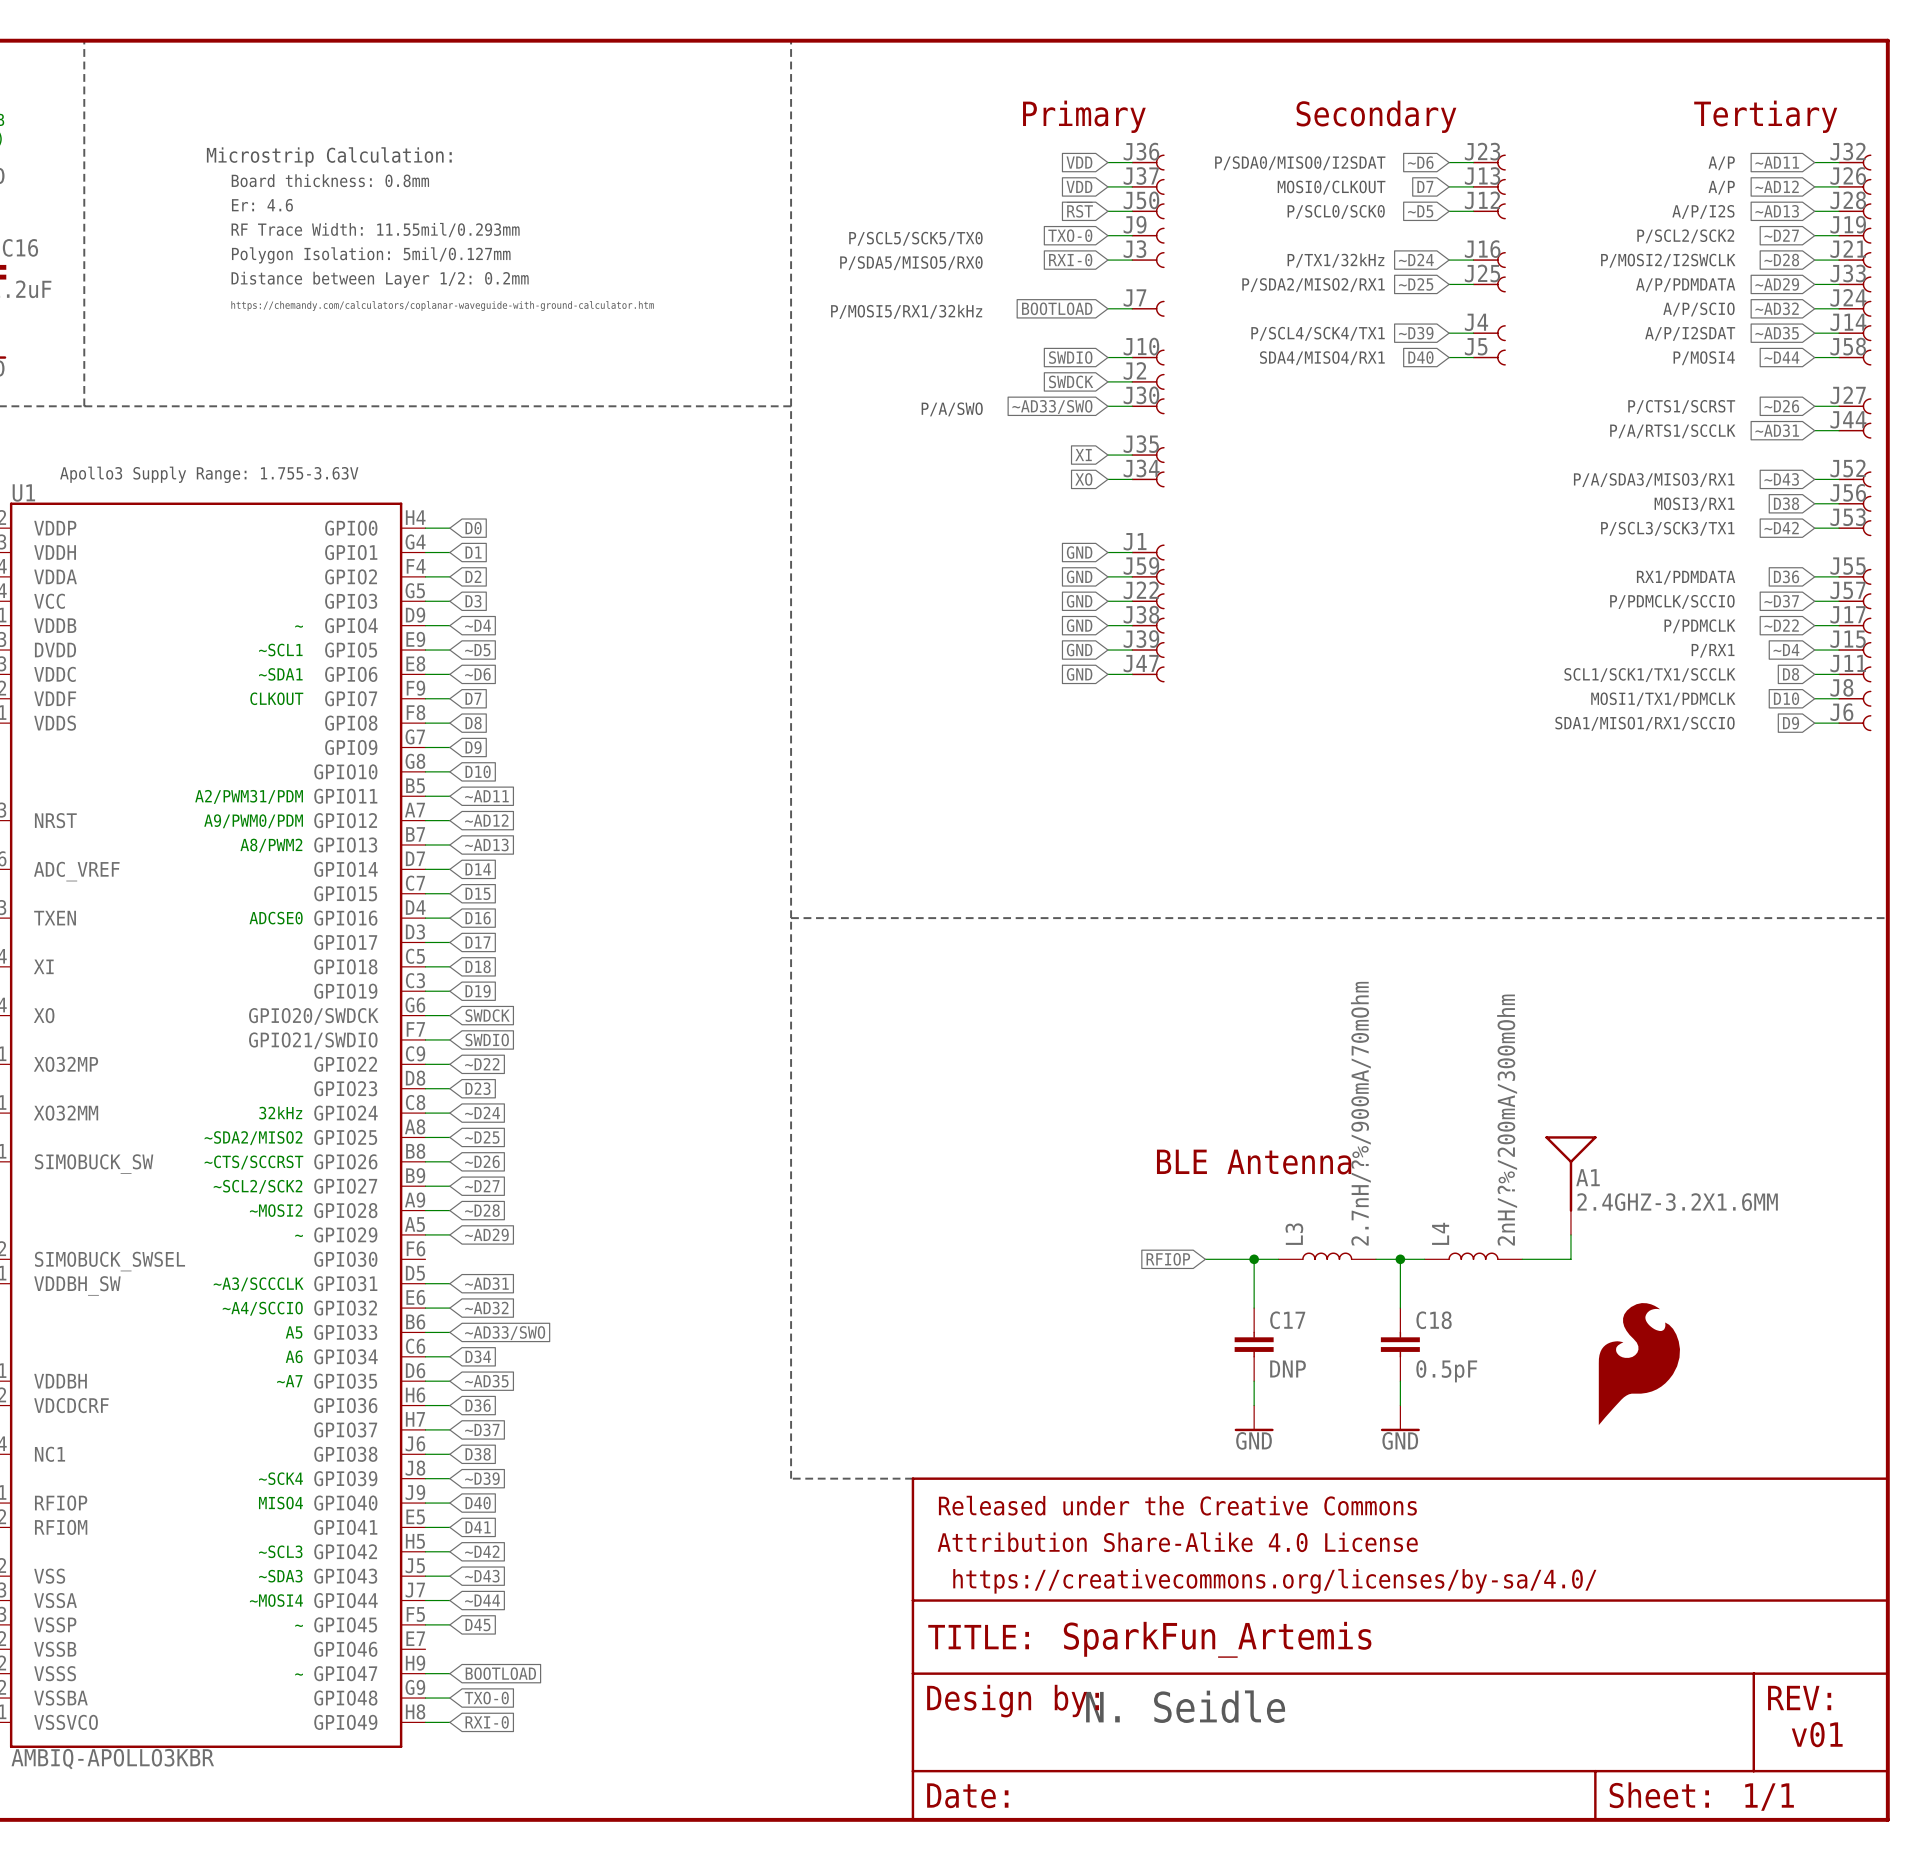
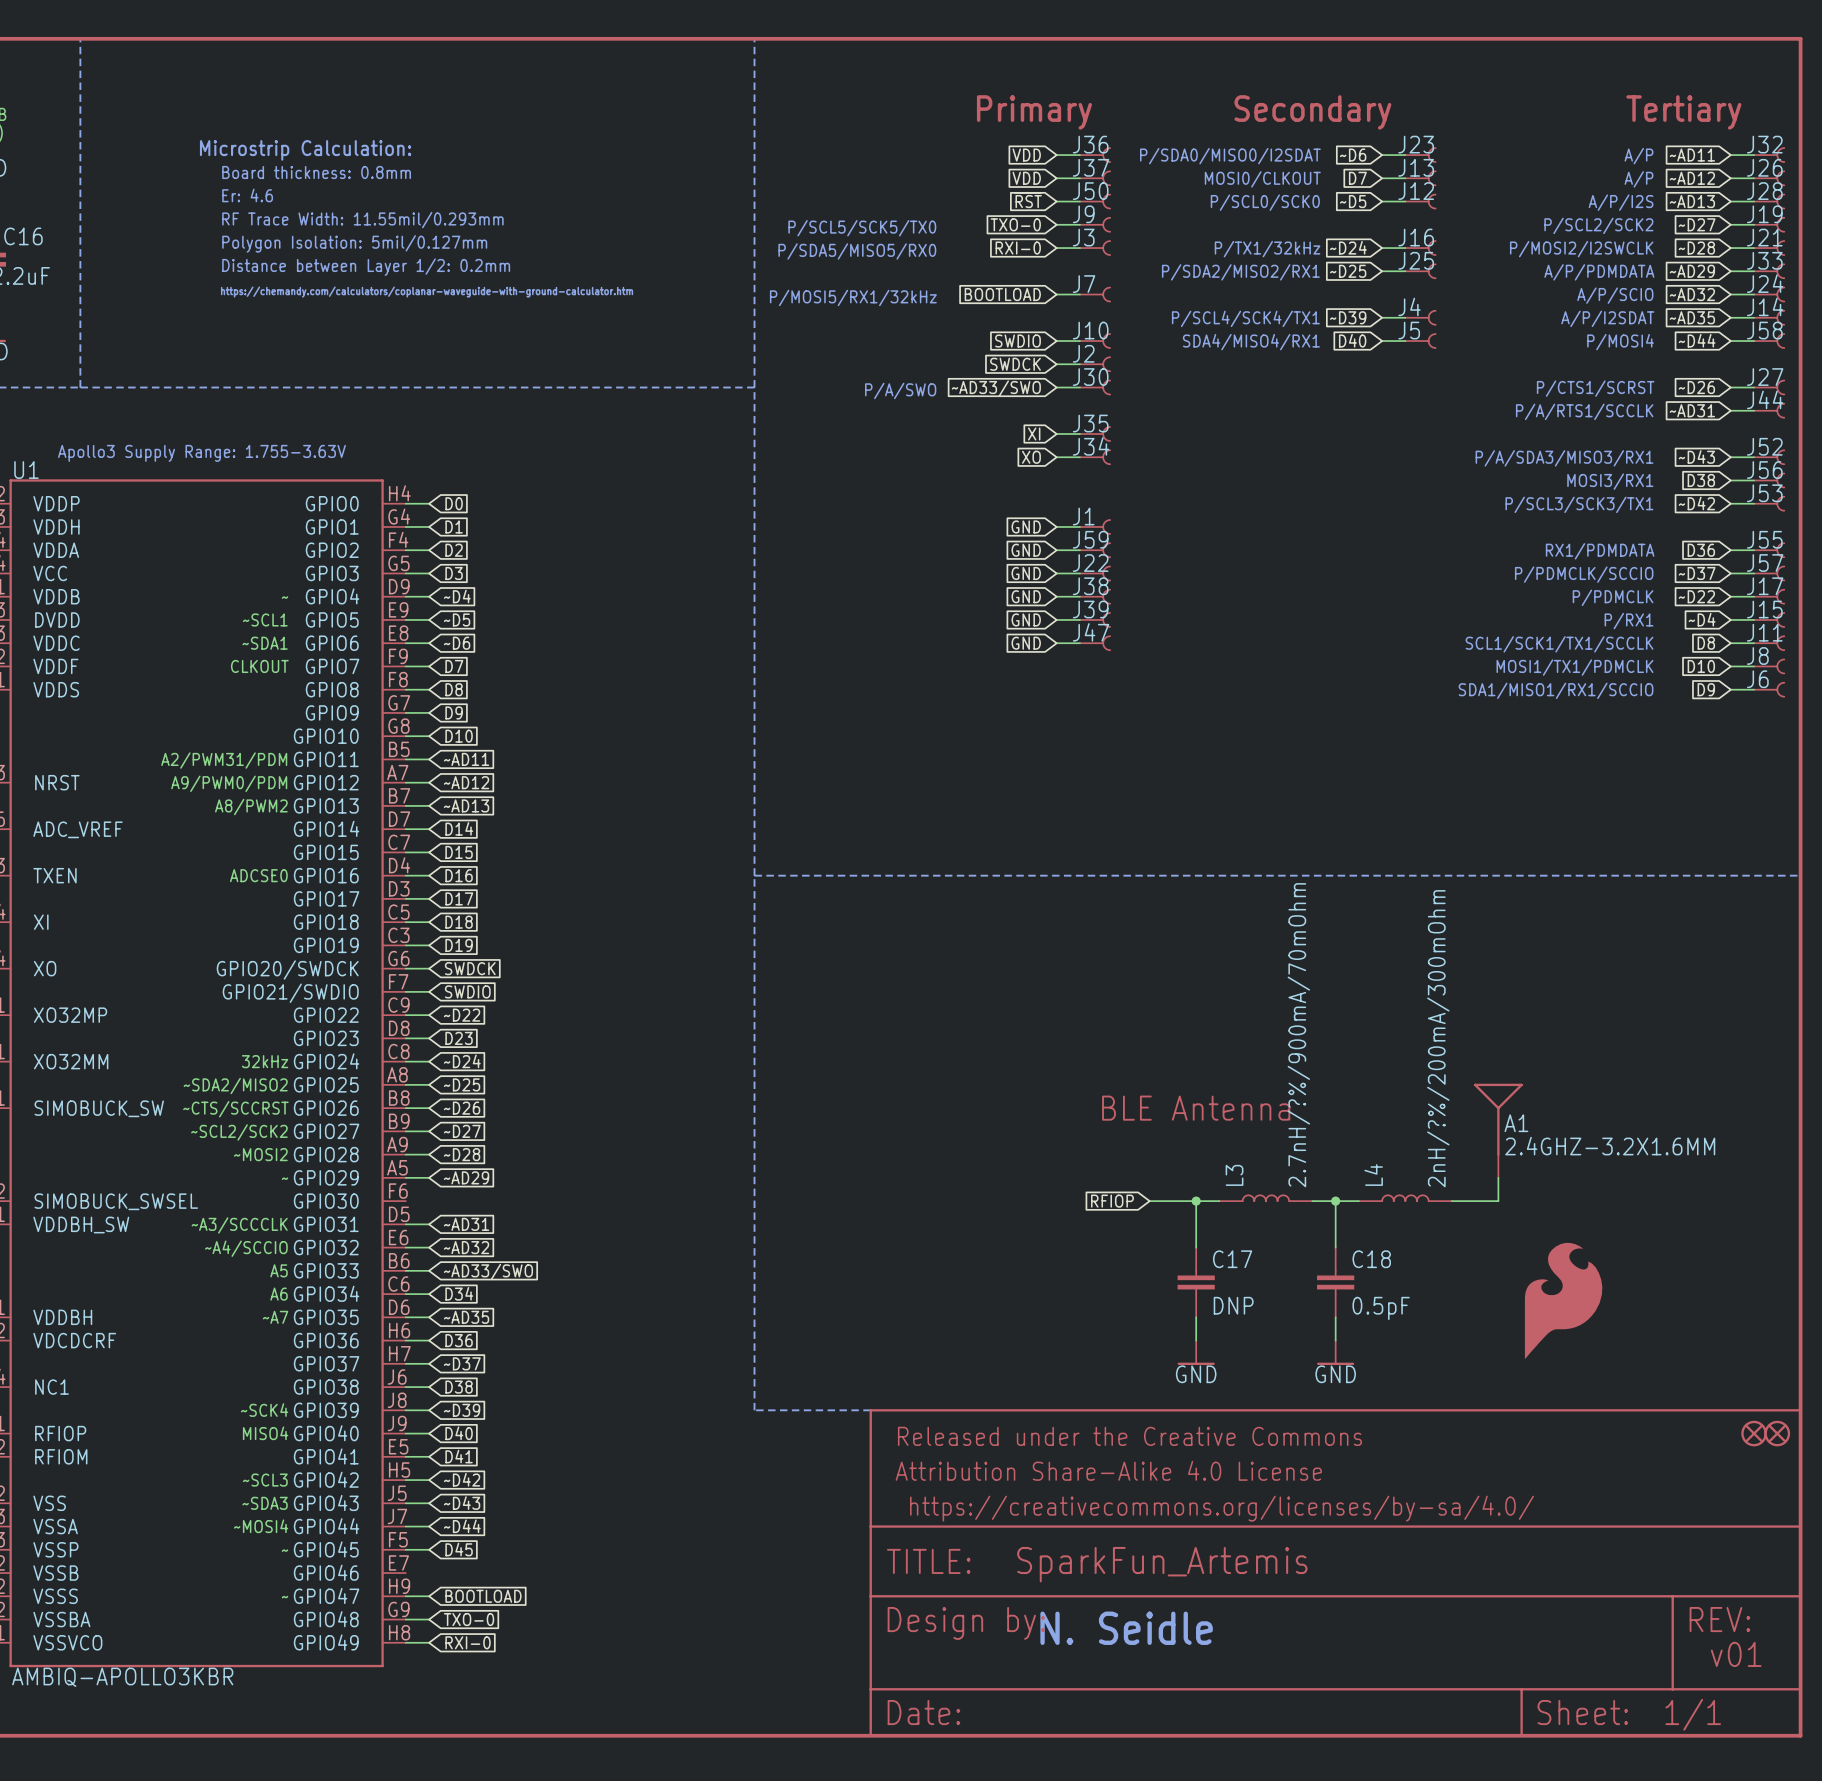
part: none -> (1754, 1433)
part: none -> (1777, 1433)

